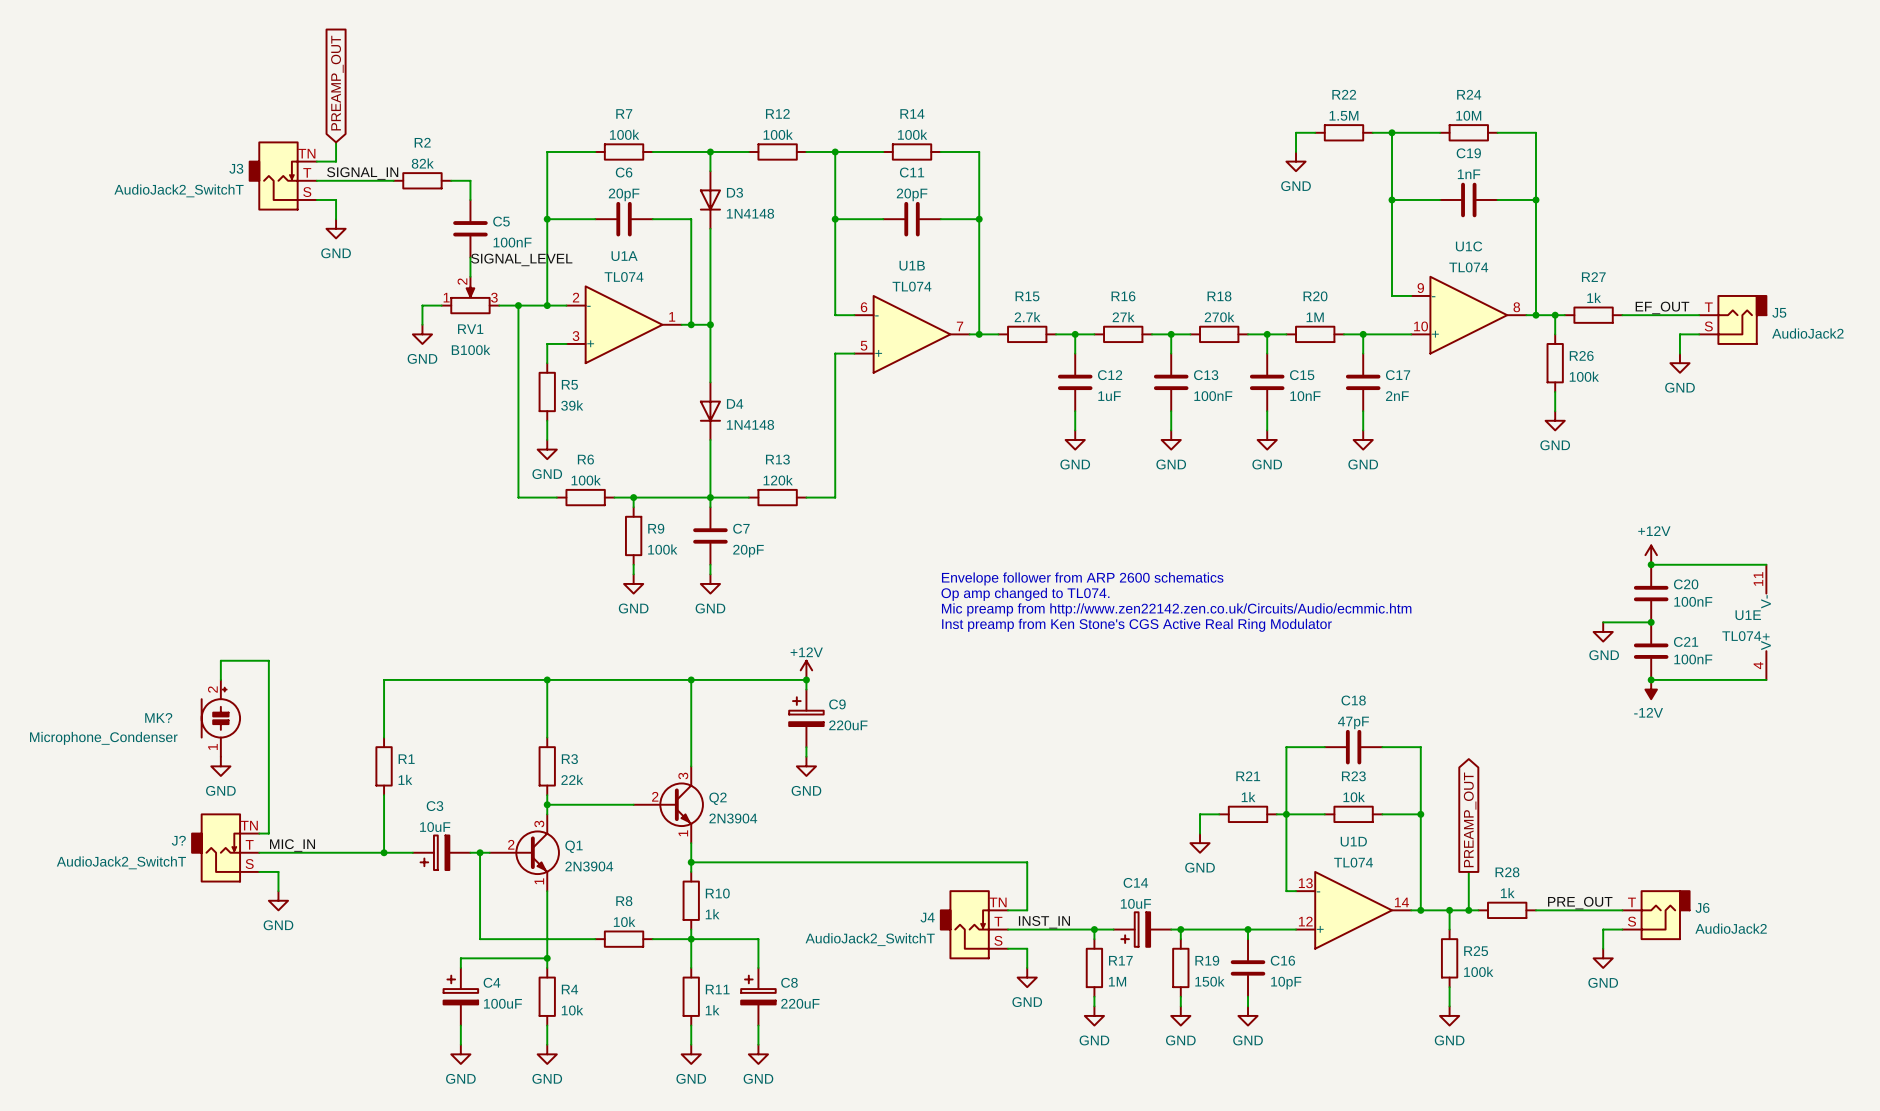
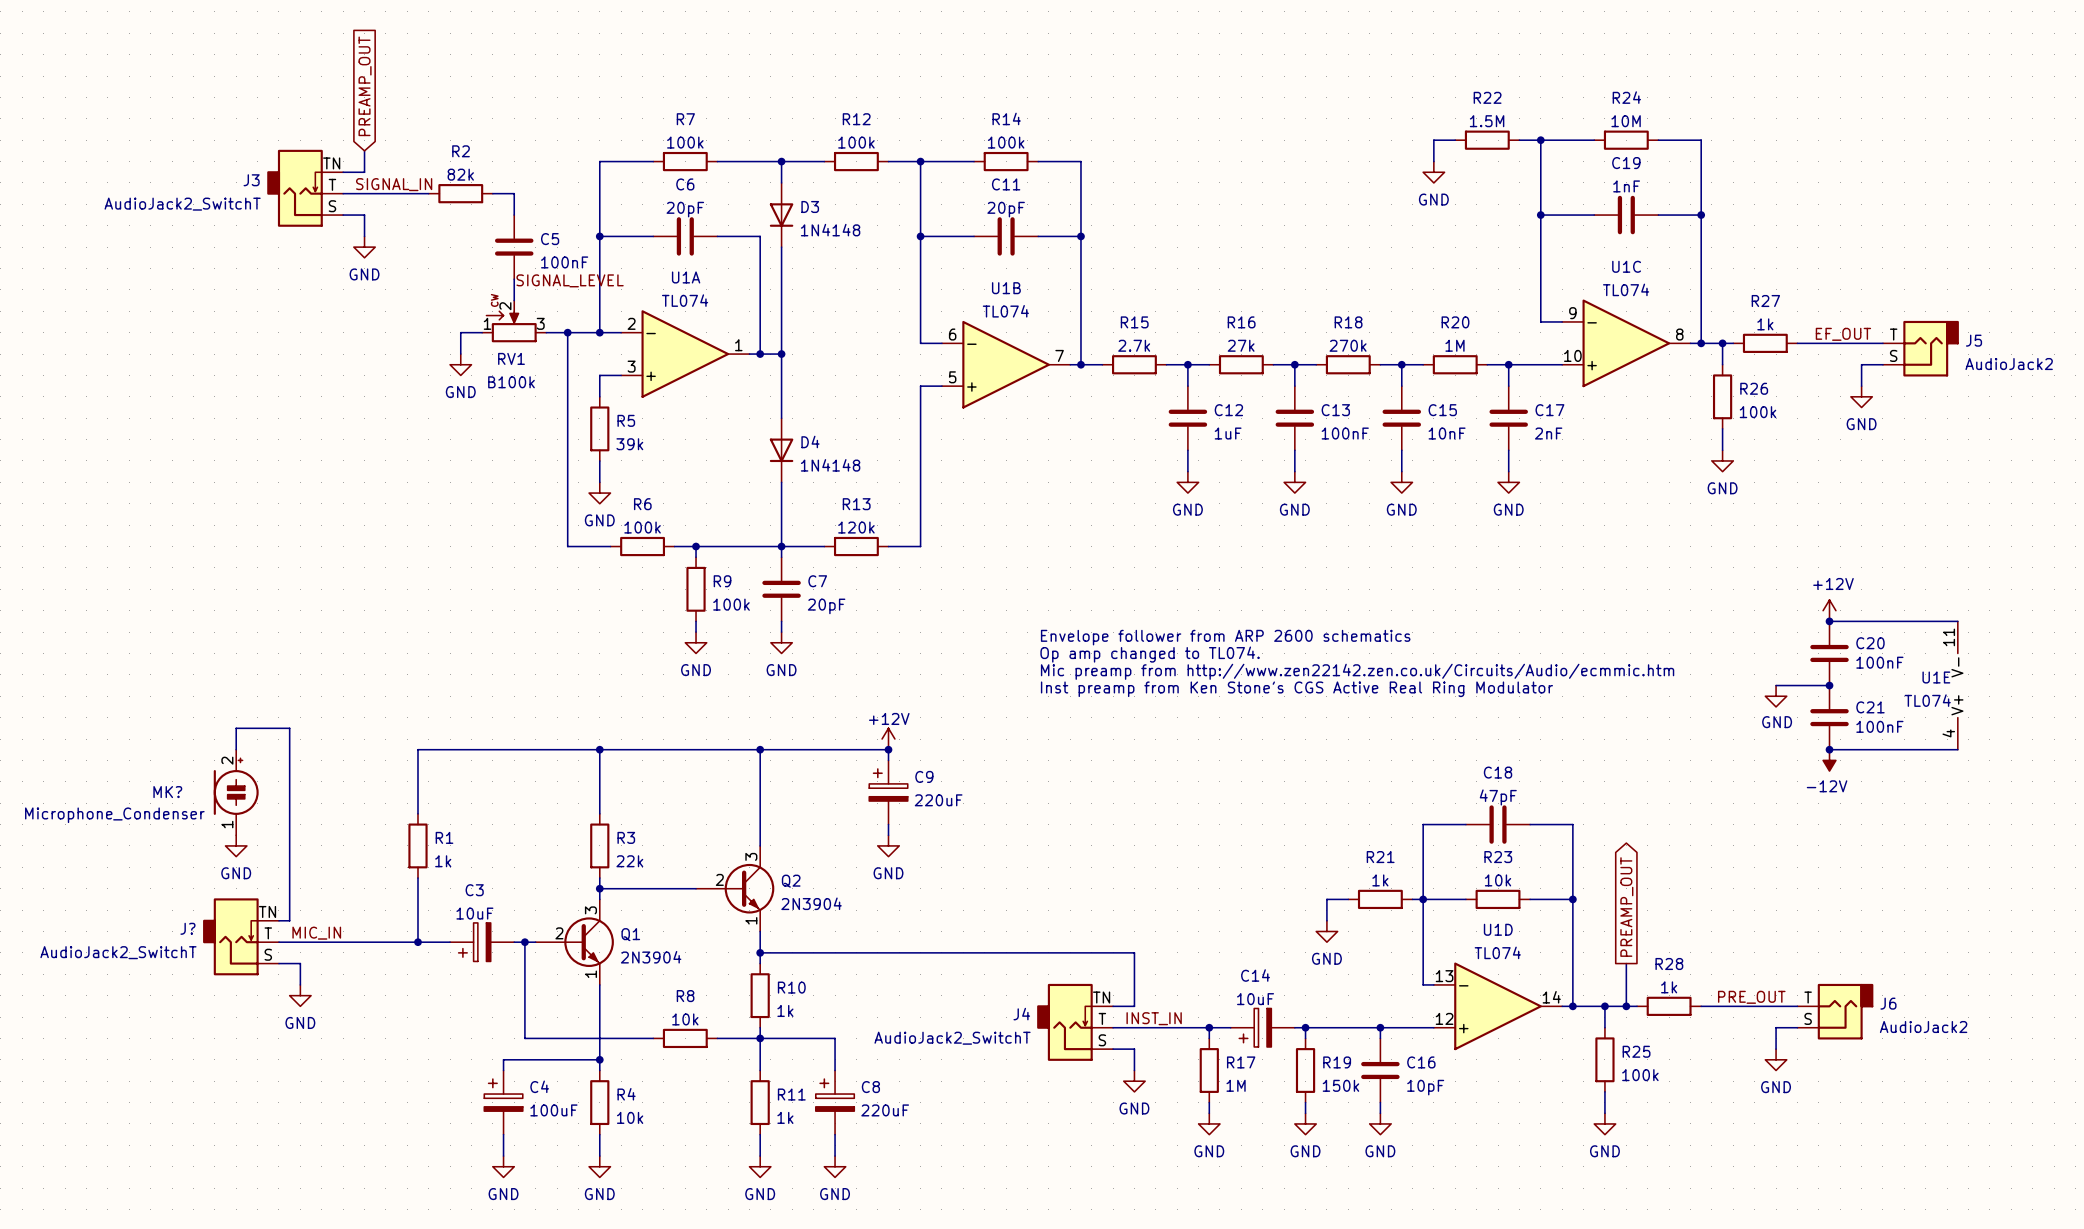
RV1 symbol: [441, 276, 500, 315] -> [482, 300, 547, 343]

